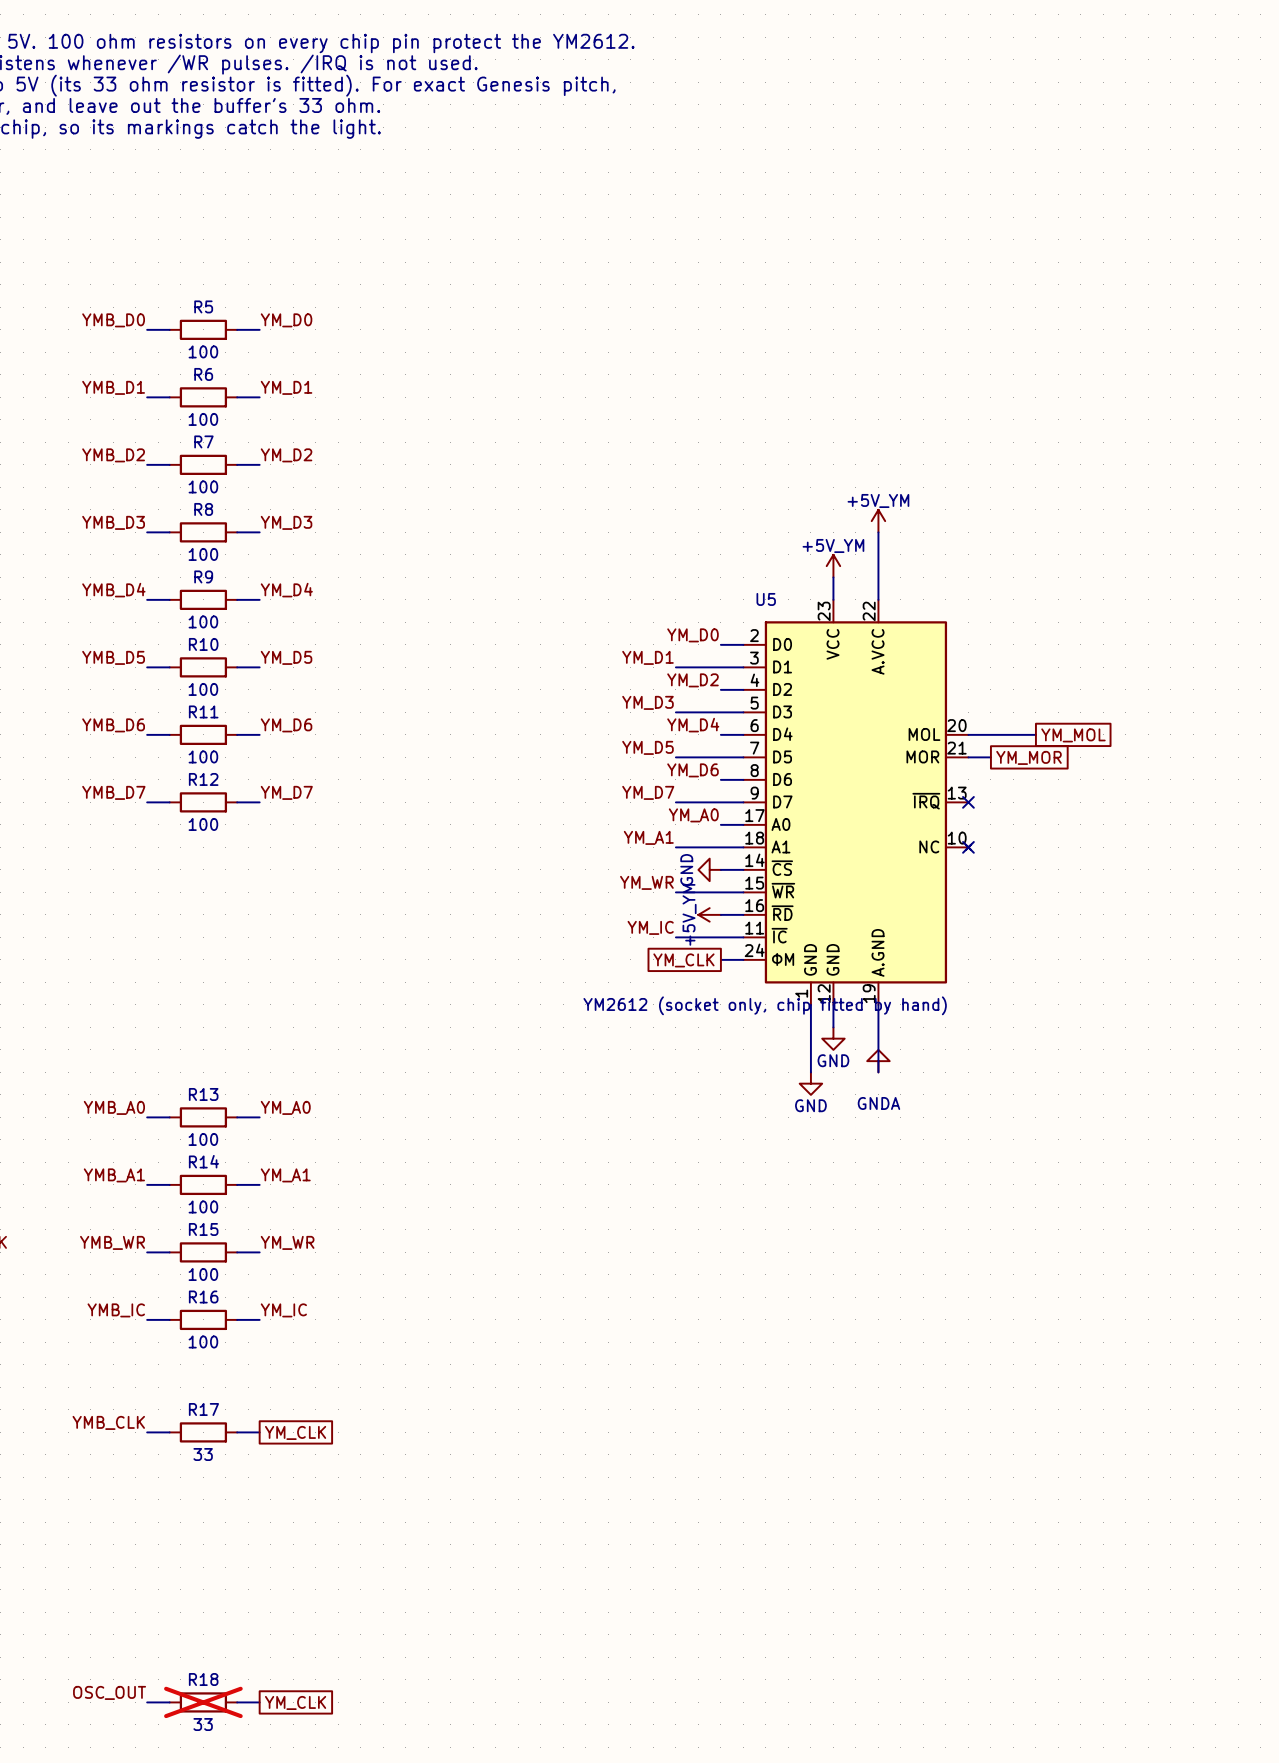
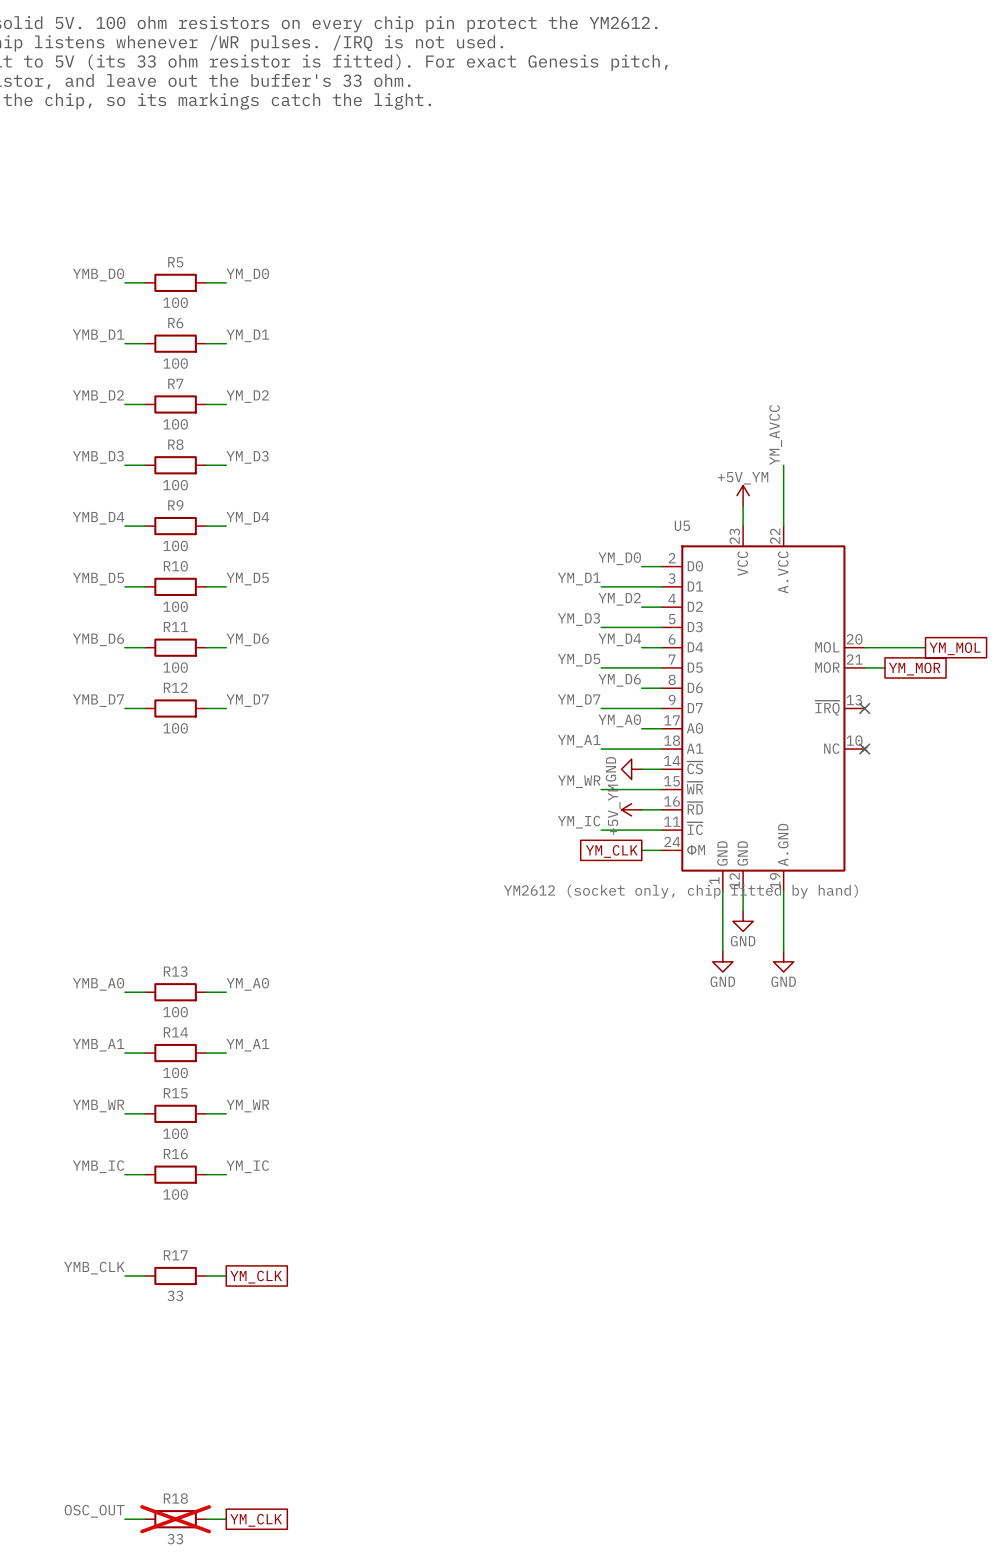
label: none -> YM_AVCC (775, 435)
power symbol: +5V_YM (878, 521) -> none
power symbol: GNDA (878, 1061) -> none
power symbol: none -> GND (783, 961)

